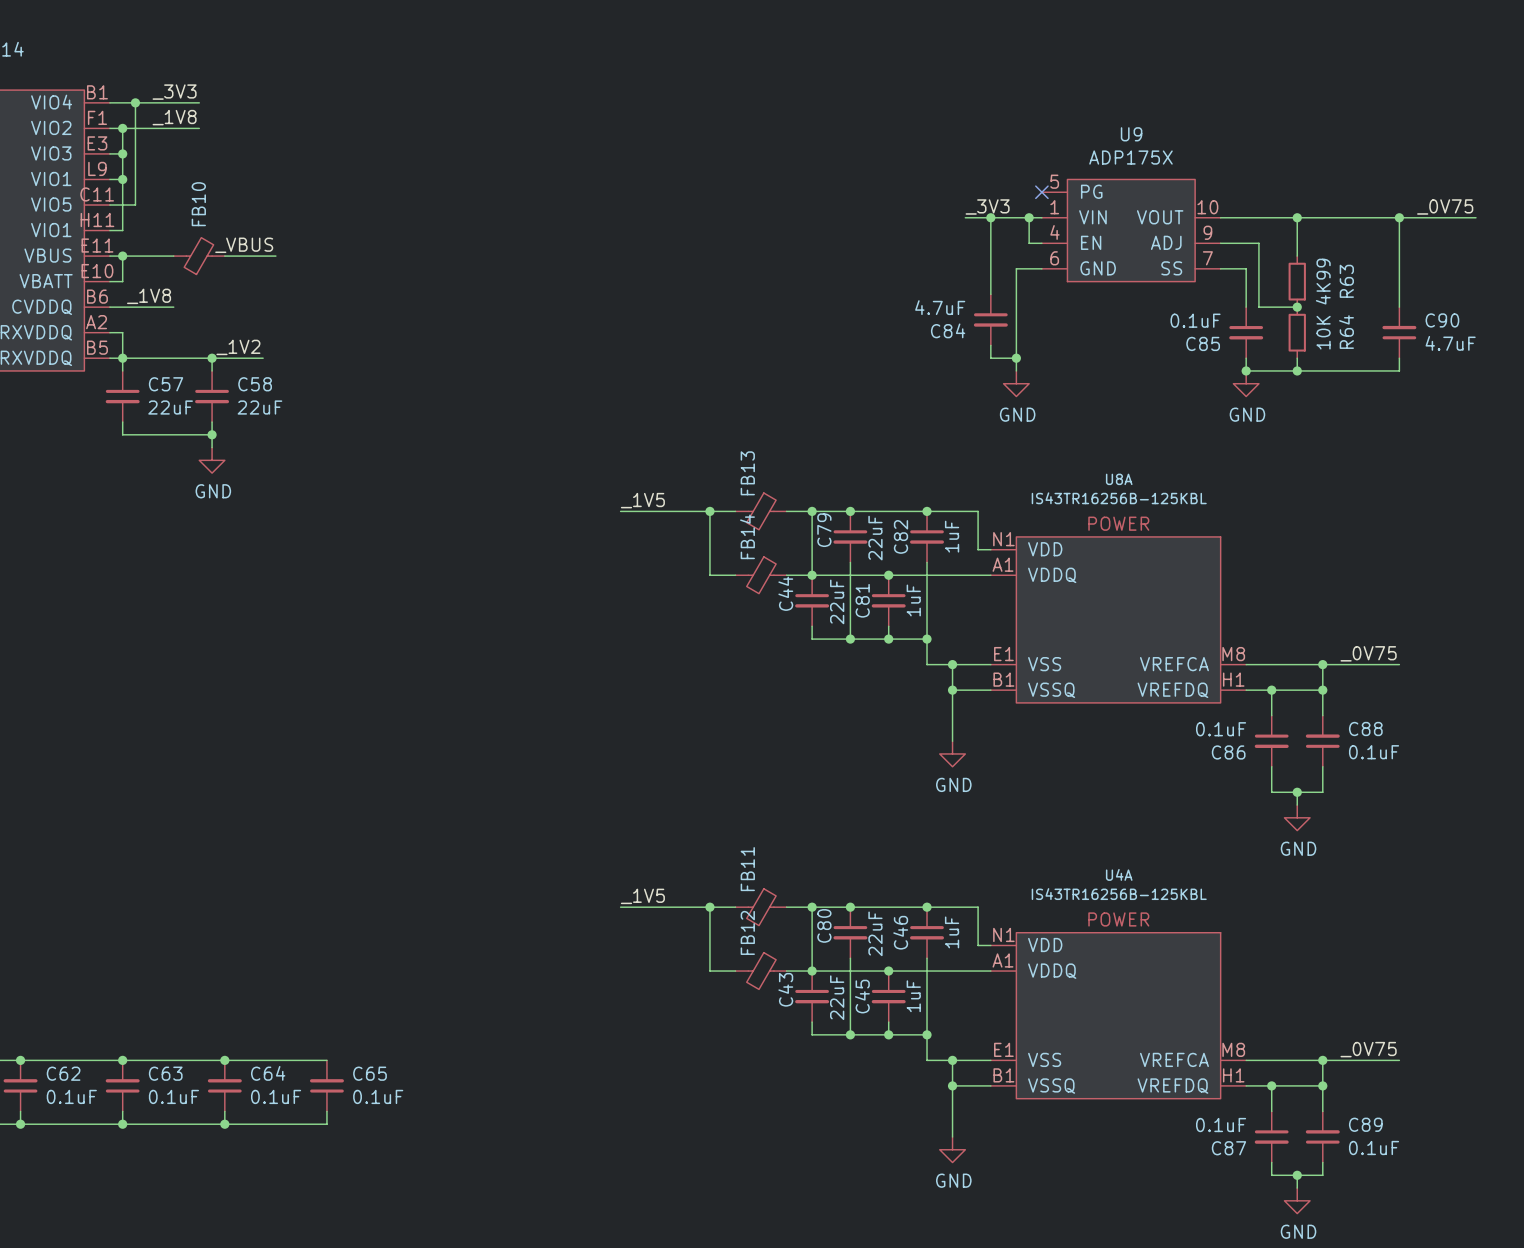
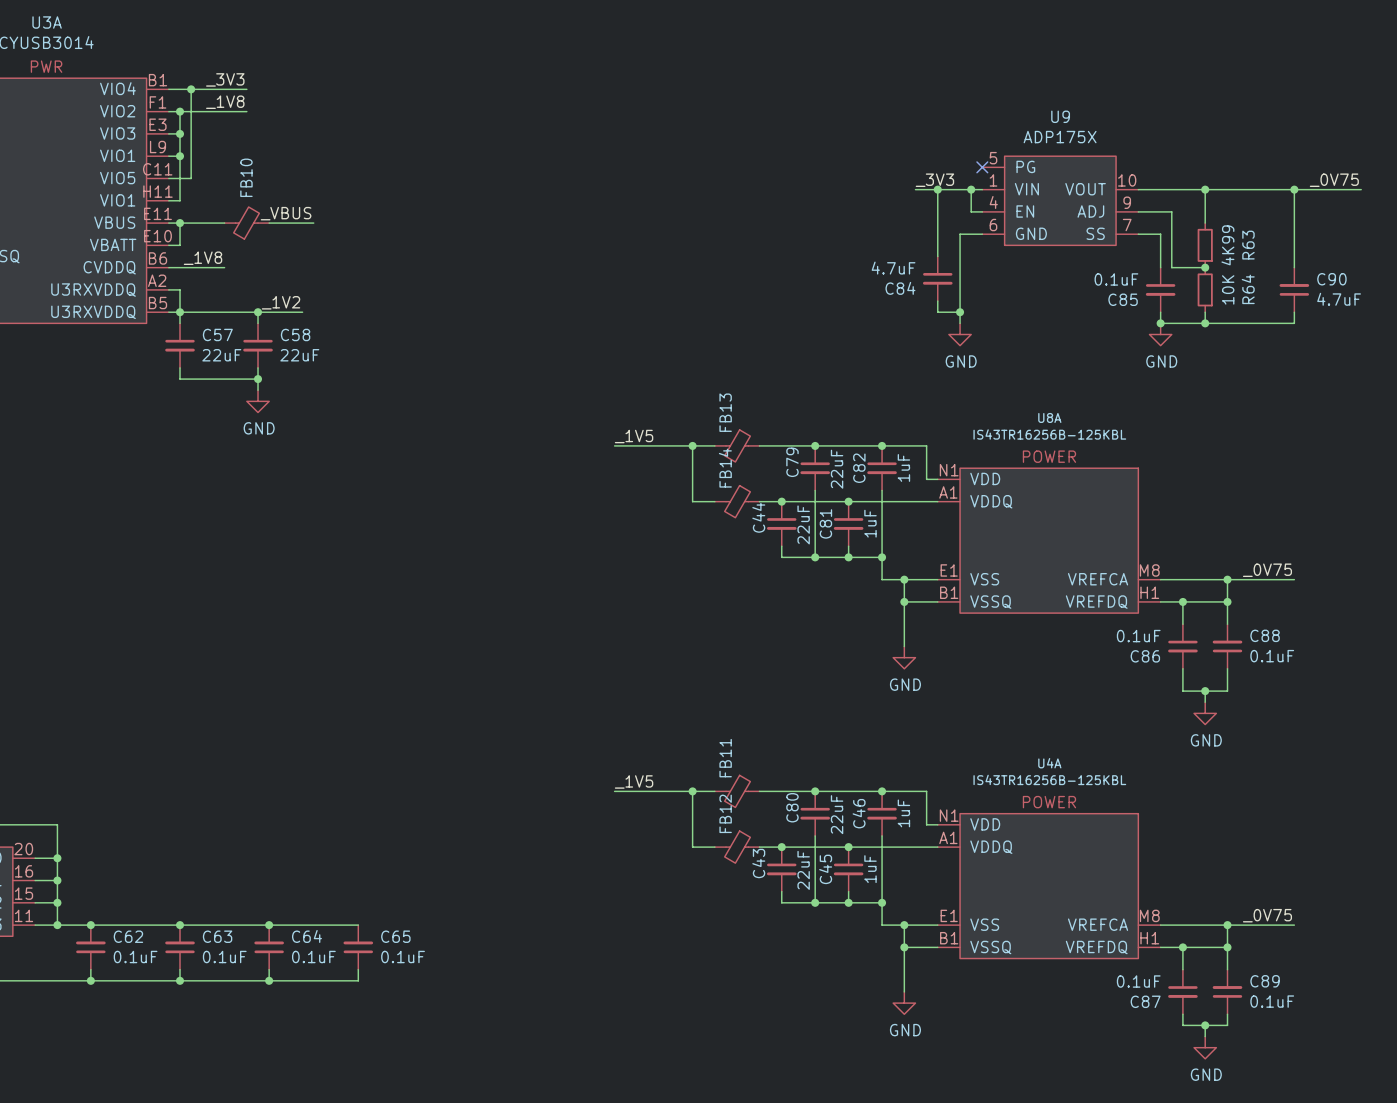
wire: (812, 511) (812, 575) -> none
junction: (812, 511) -> none
wire: (812, 907) (812, 971) -> none
junction: (812, 907) -> none

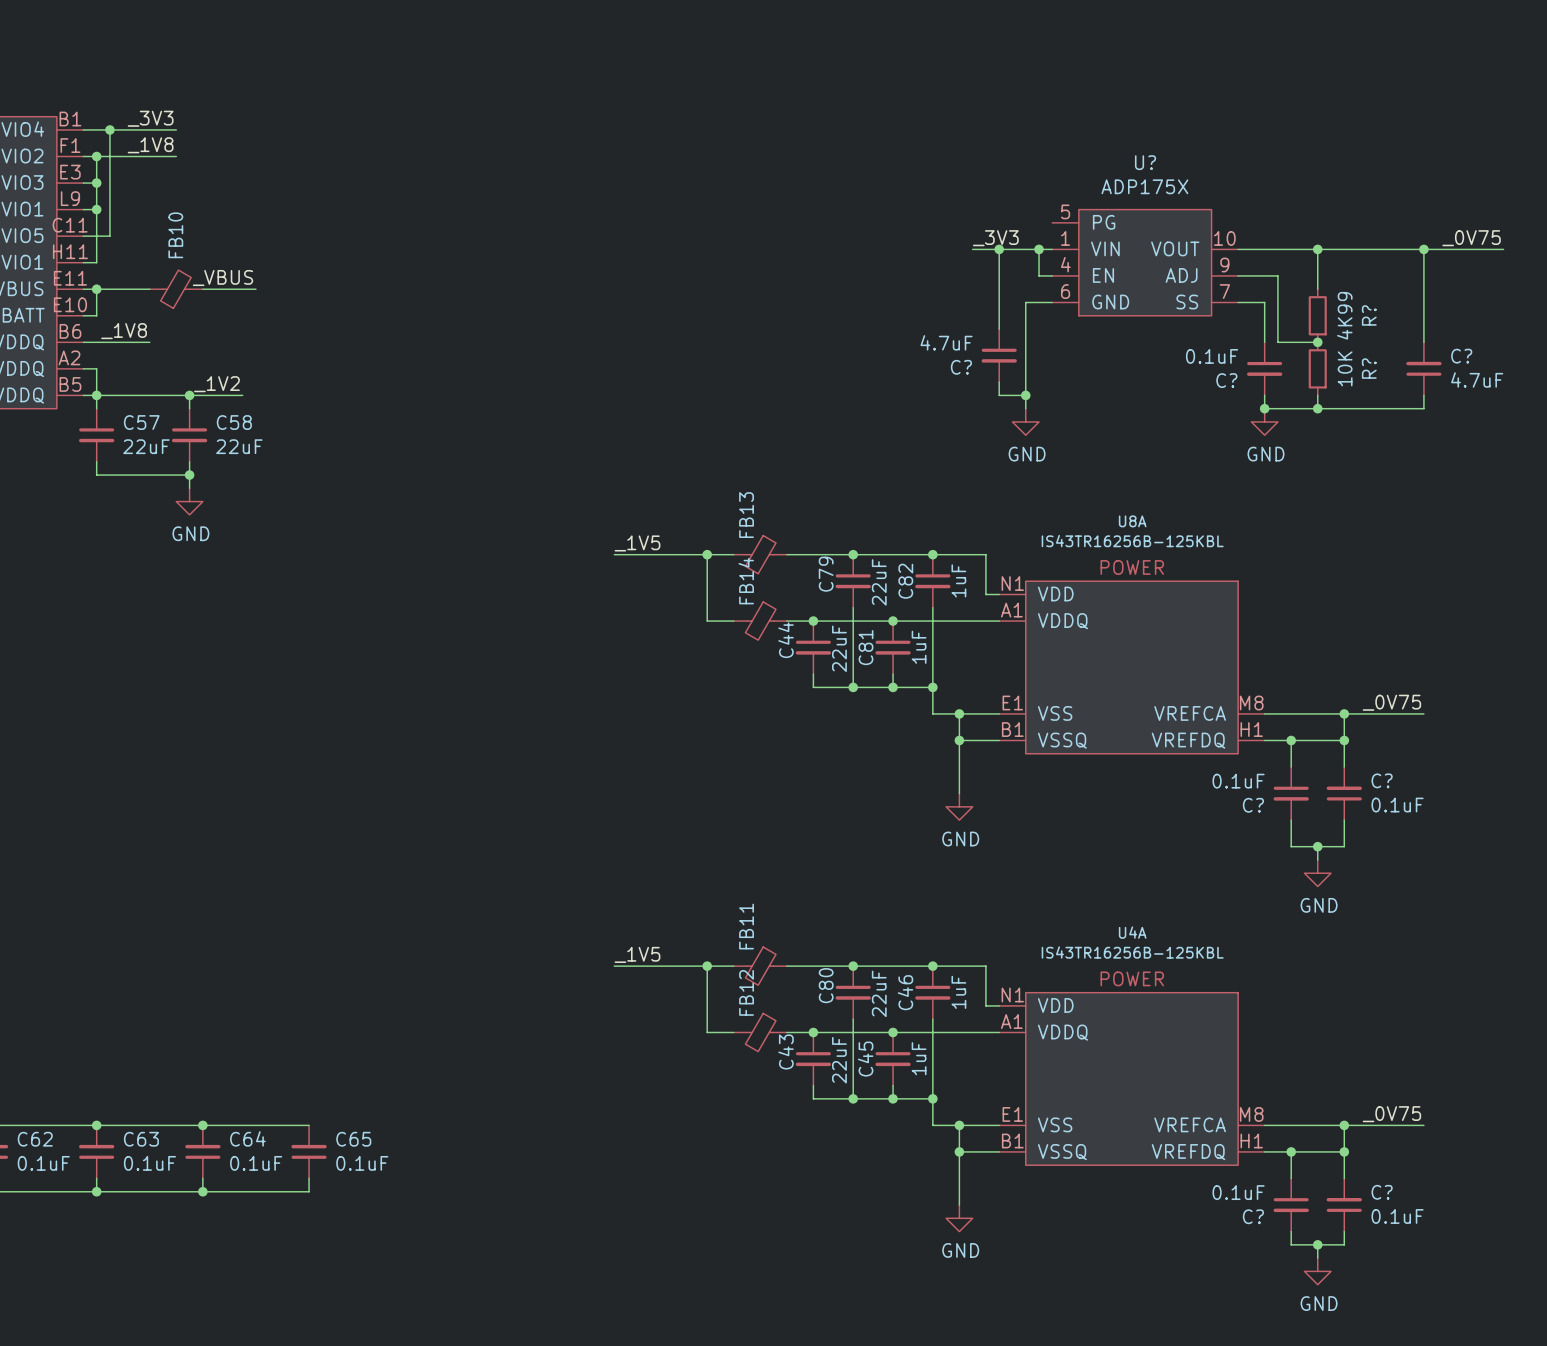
U9 name: U9 (1060, 116) -> U? (1145, 162)
no-connect mark: (982, 167) -> none
R63 name: R63 (1248, 245) -> R? (1369, 315)
C90 name: C90 (1331, 279) -> C? (1461, 356)
C84 name: C84 (900, 288) -> C? (961, 367)
R64 name: R64 (1248, 289) -> R? (1369, 368)
C85 name: C85 (1123, 299) -> C? (1226, 380)
C88 name: C88 (1265, 635) -> C? (1382, 780)
C86 name: C86 (1145, 656) -> C? (1253, 805)
C89 name: C89 (1265, 981) -> C? (1382, 1192)
C87 name: C87 (1145, 1001) -> C? (1253, 1216)

